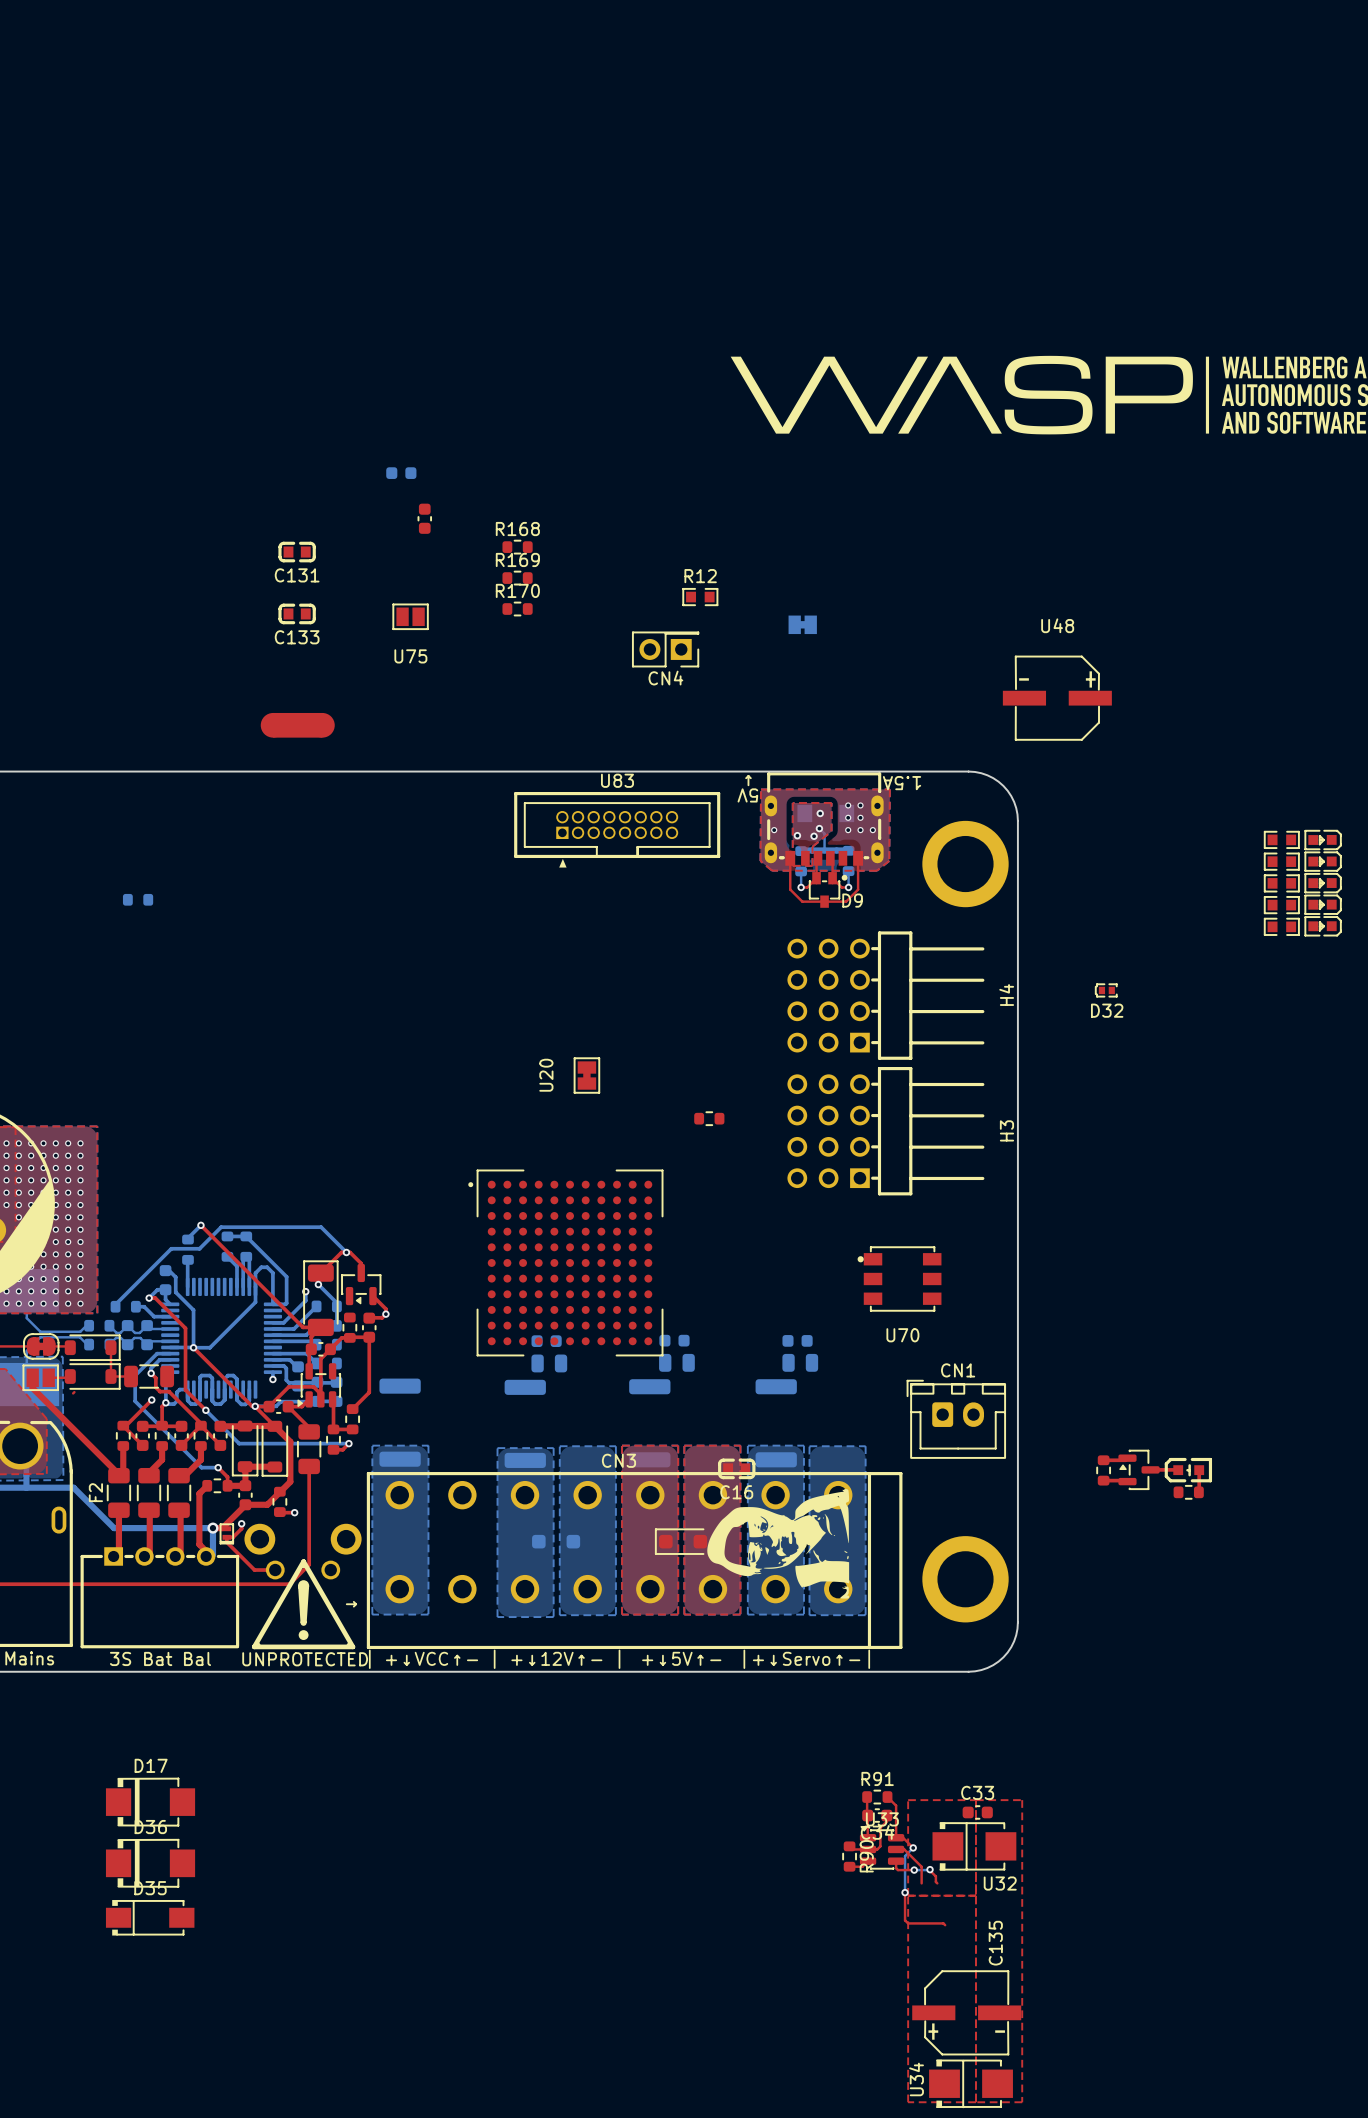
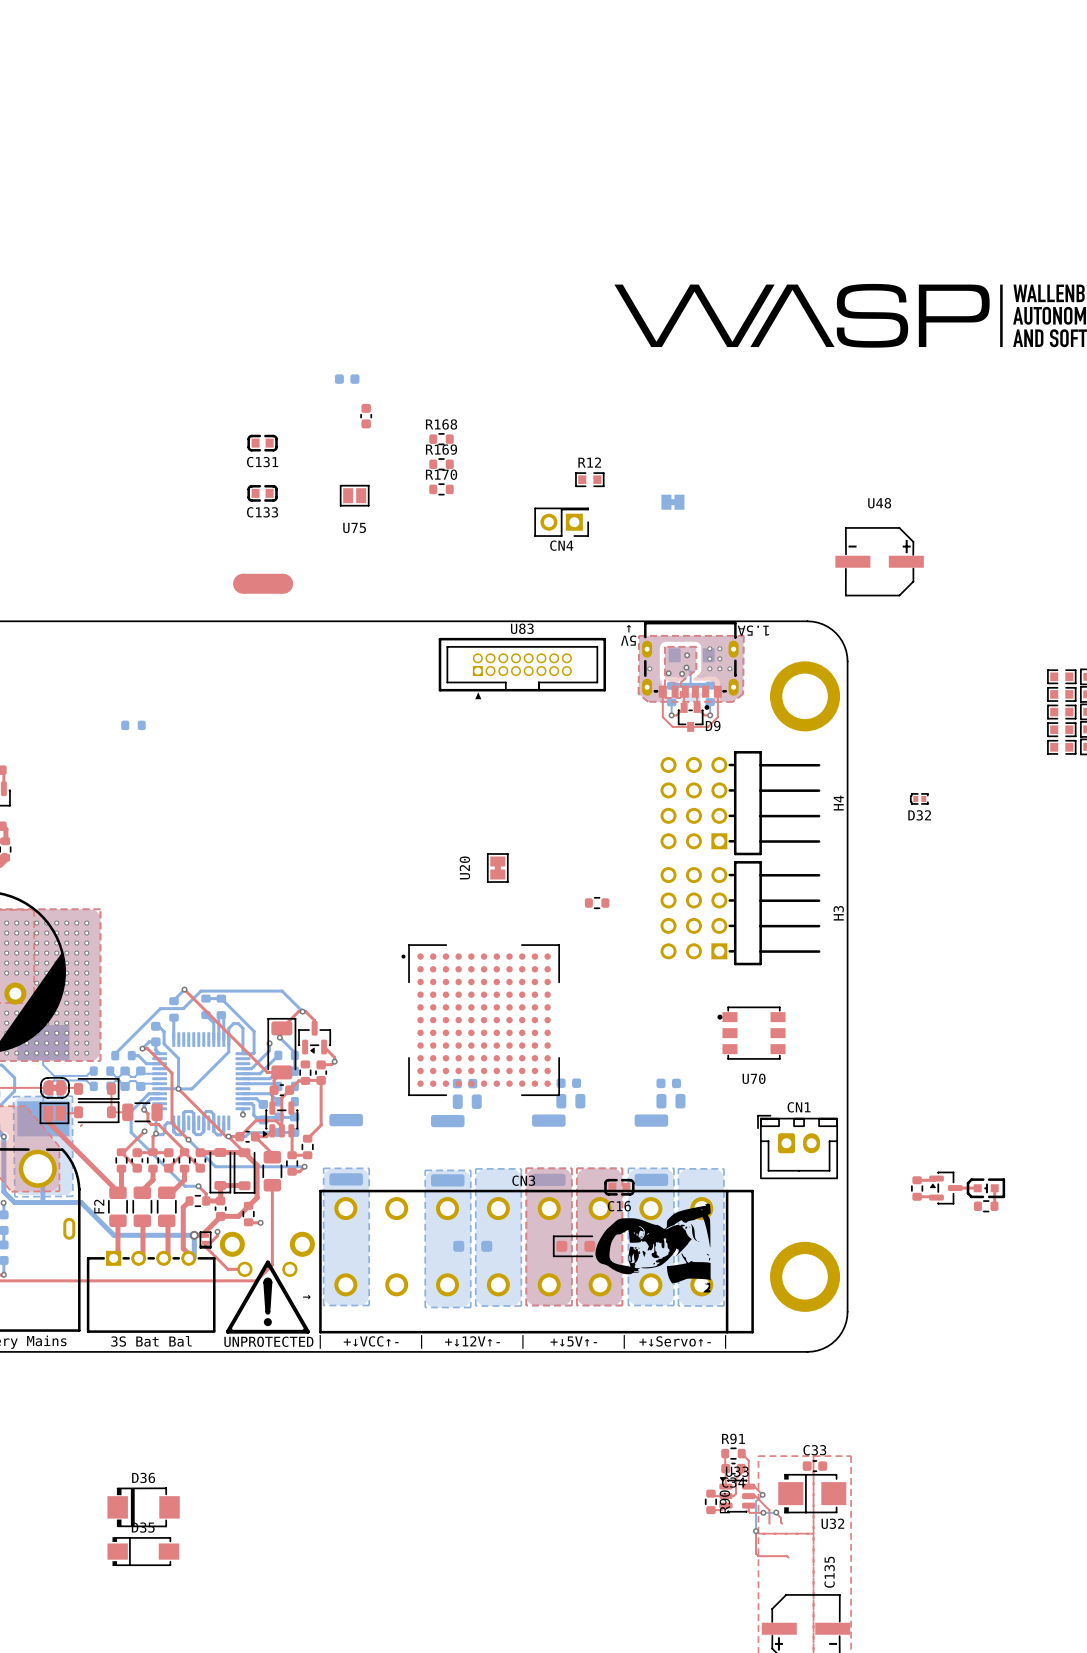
D17: (150, 1802) -> none

